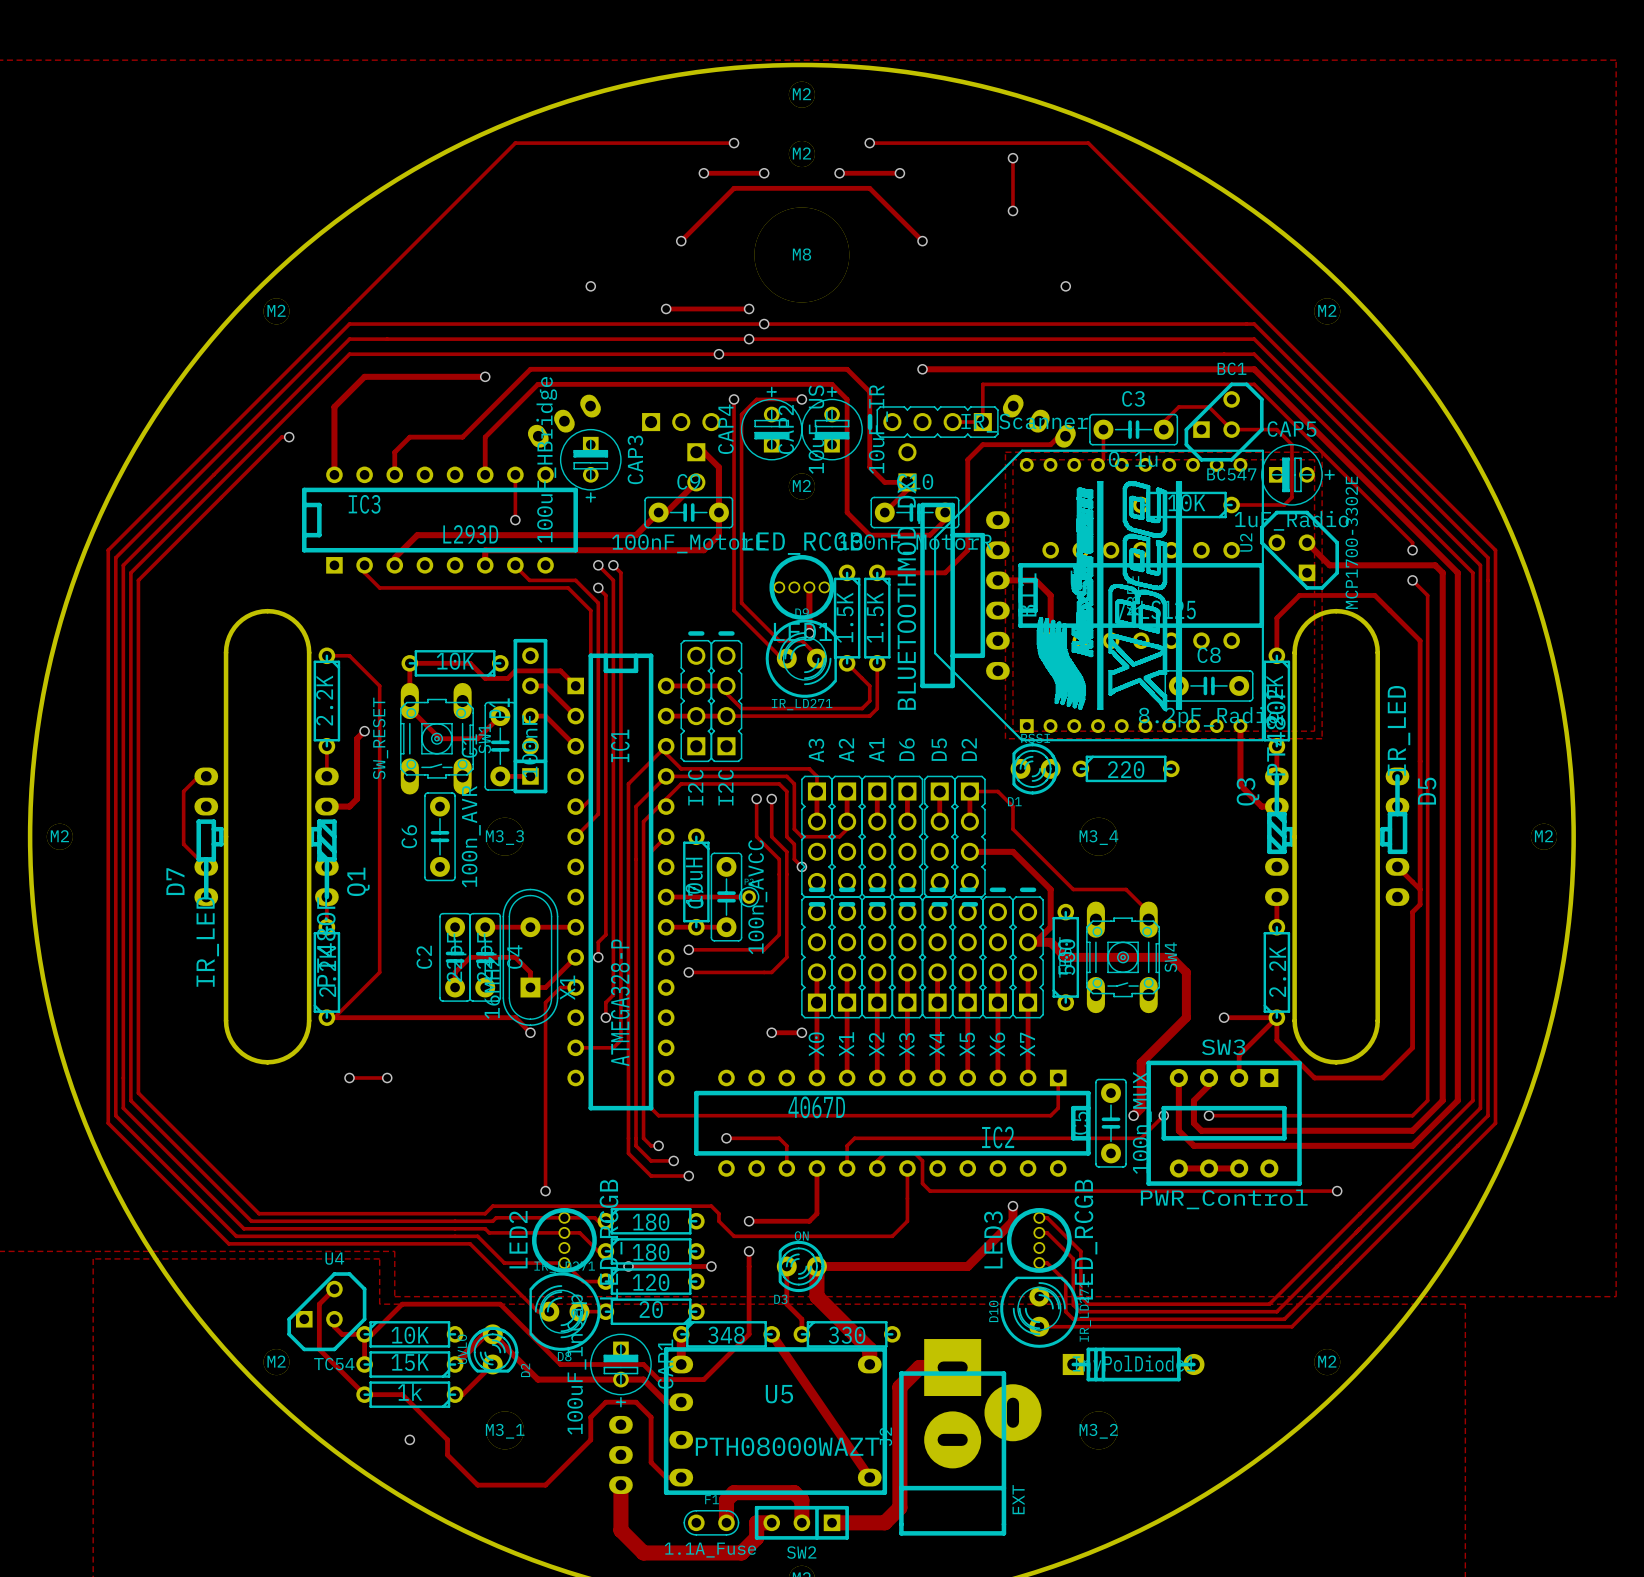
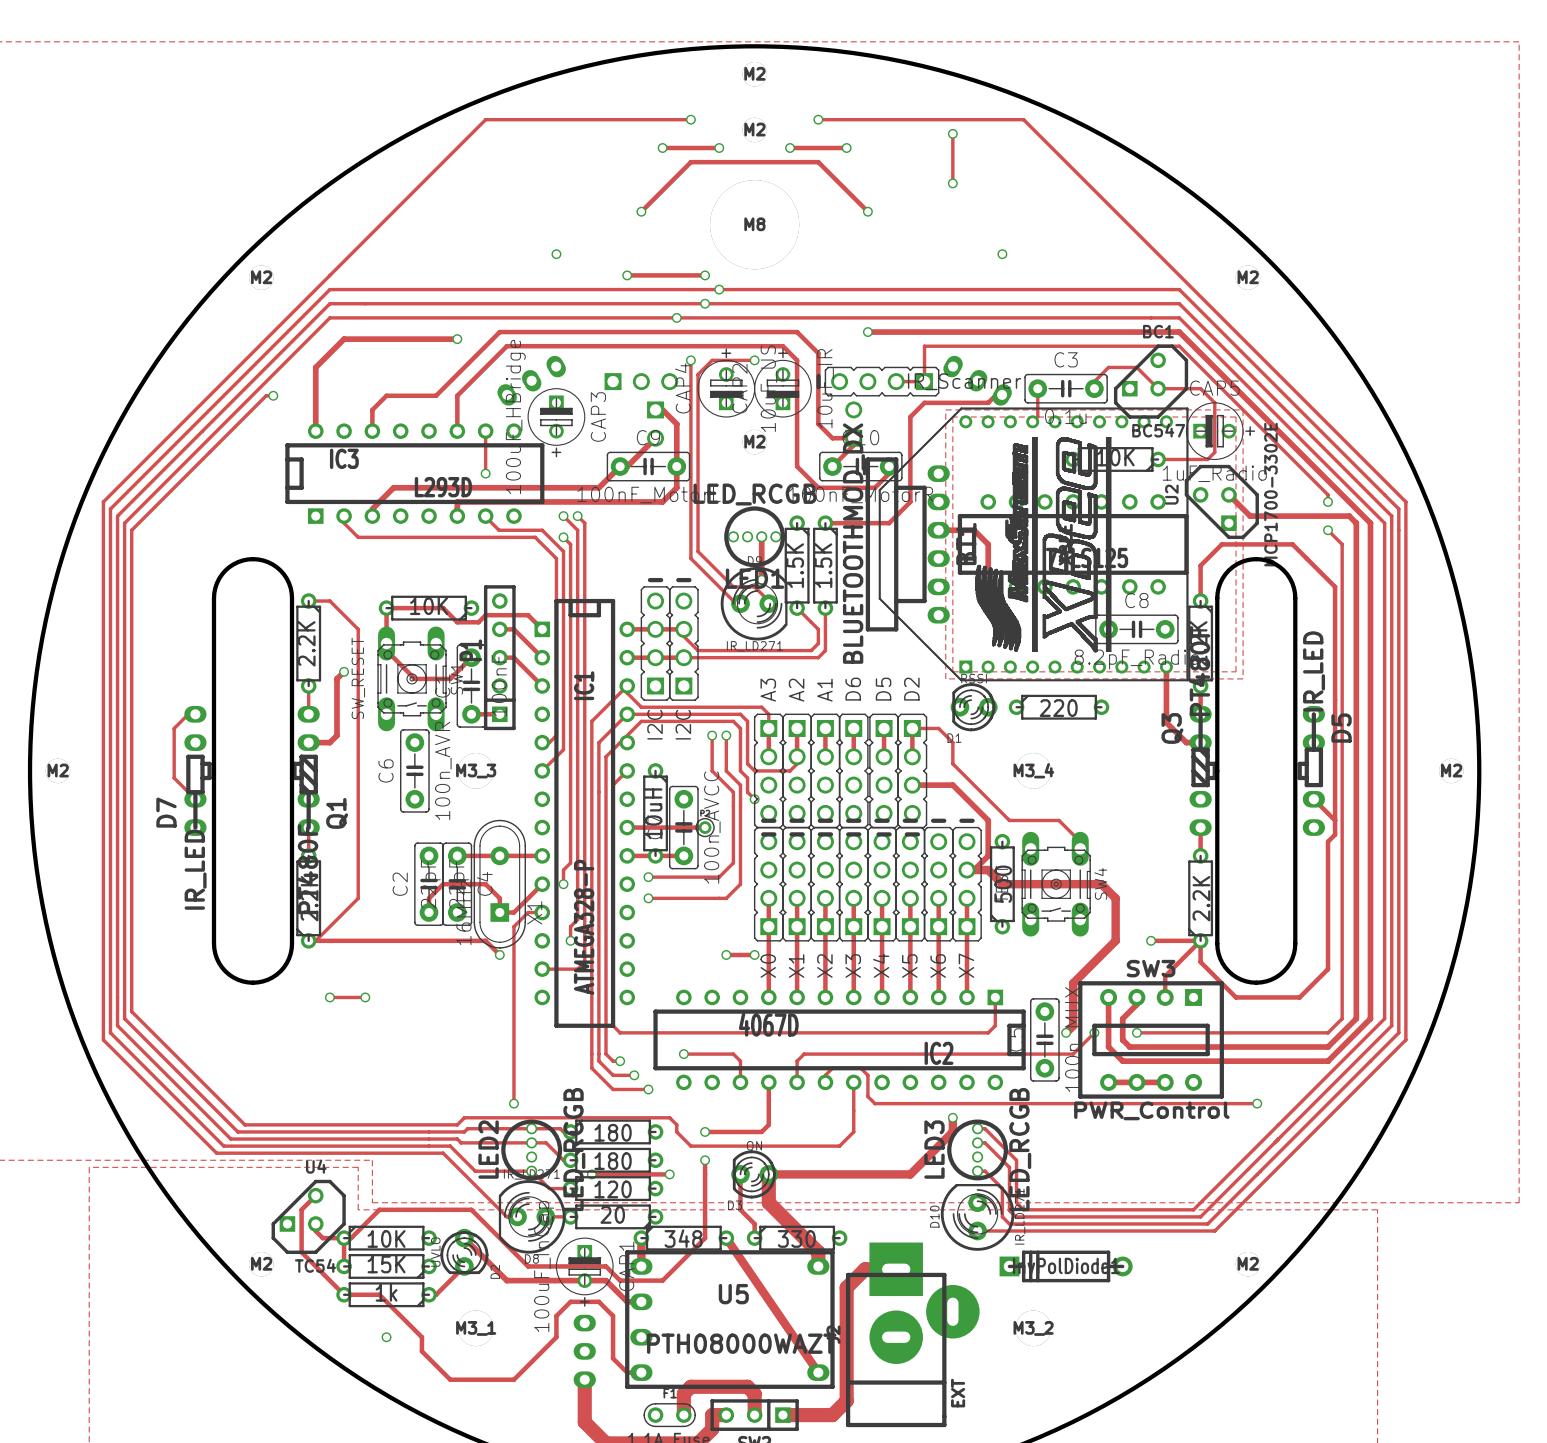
track: (492, 1334) (485, 1334) (455, 1364) -> none

